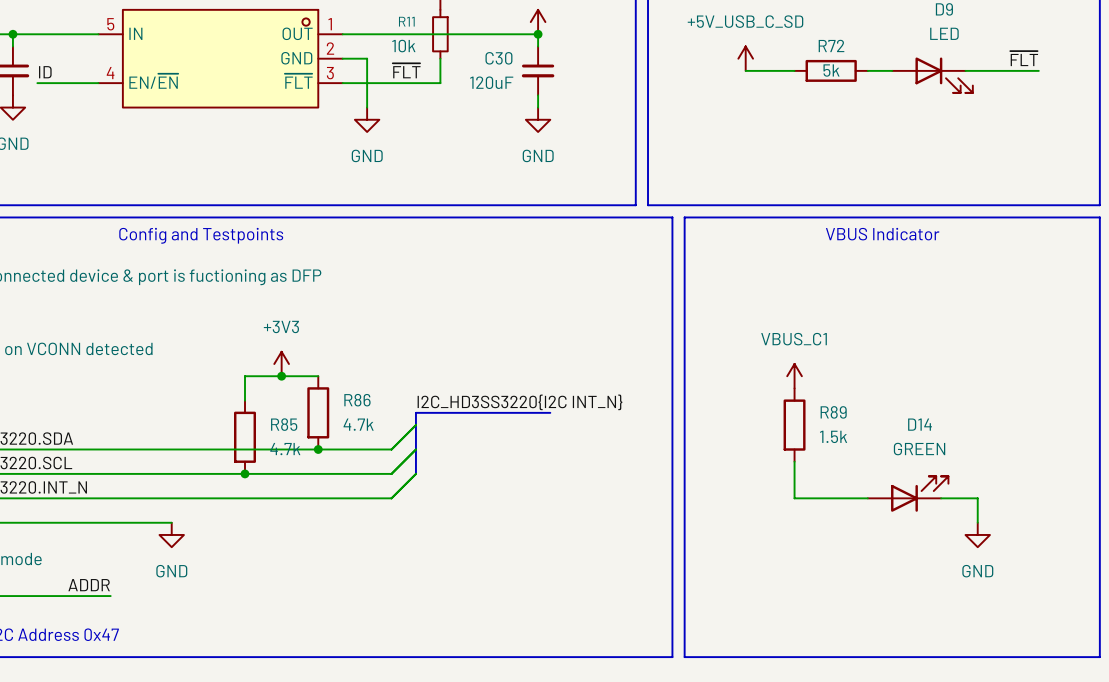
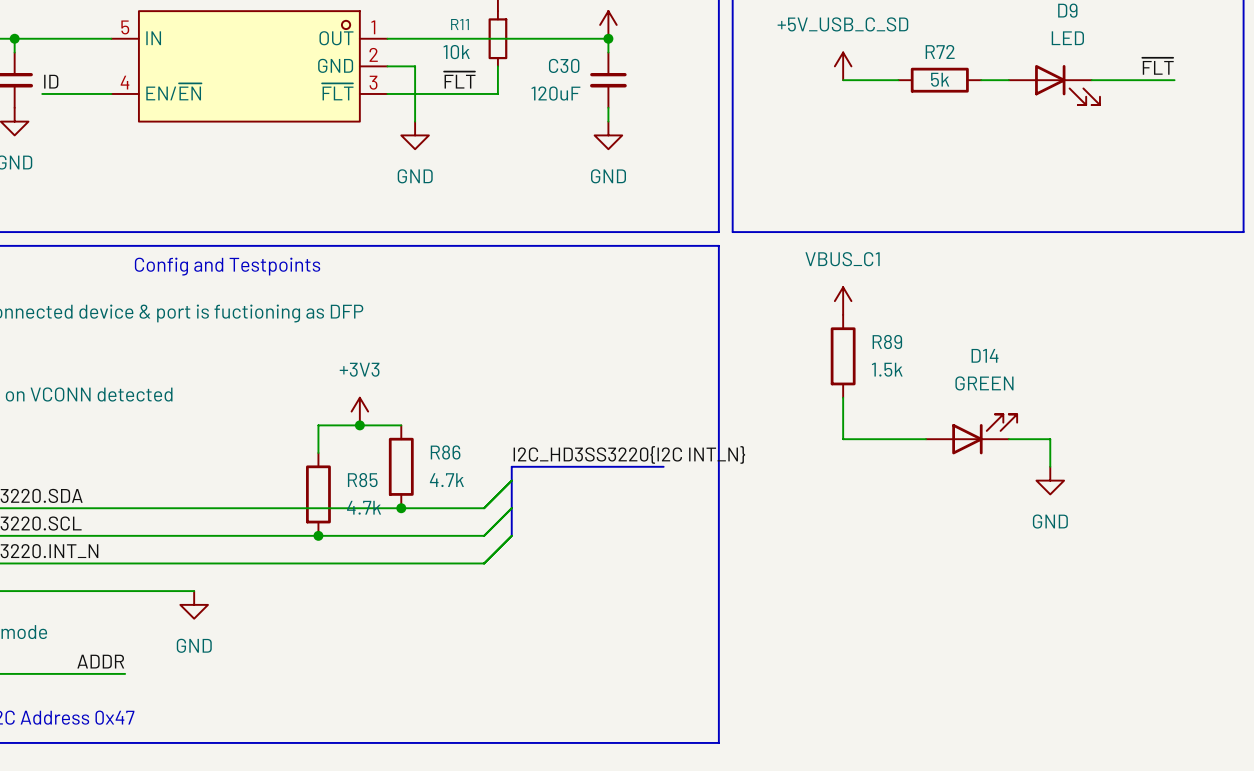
line: (635, 217) (672, 217) (672, 657) (635, 657) -> (718, 245) (718, 742)
line: (684, 217) (1099, 217) (1099, 657) (684, 657) (684, 217) -> none
text: VBUS Indicator (882, 234) -> none
power symbol position: +3V3 (281, 364) -> +3V3 (359, 411)
wire: (281, 376) (245, 376) (245, 400) -> (318, 425) (318, 453)
junction: (281, 376) -> none
wire: none -> (359, 425) (401, 425)
junction: none -> (359, 425)
power symbol position: VBUS_C1 (794, 376) -> VBUS_C1 (843, 301)
label position: I2C_HD3SS3220{I2C INT_N} (519, 402) -> I2C_HD3SS3220{I2C INT_N} (629, 454)
R86 position: (318, 412) -> (401, 466)
bus: (452, 412) (415, 412) (415, 473) -> (511, 466) (511, 535)
bus: none -> (622, 466) (663, 466)
wire: (415, 425) (391, 449) -> (511, 480) (484, 508) (442, 508)
R89 position: (794, 425) -> (843, 356)
R85 position: (245, 437) -> (318, 494)
junction: (318, 449) -> none
junction: none -> (401, 508)
wire: (415, 449) (391, 473) -> (511, 508) (484, 535) (442, 535)
wire: (794, 461) (794, 498) (867, 498) -> (843, 397) (843, 439) (926, 439)
junction: (245, 473) -> none
junction: none -> (318, 535)
wire: (415, 473) (391, 498) -> (511, 535) (484, 563) (442, 563)
D14 position: (908, 494) -> (971, 434)
wire: (941, 498) (977, 498) (977, 522) -> (1008, 439) (1050, 439) (1050, 466)
power symbol position: GND (977, 534) -> GND (1050, 480)

